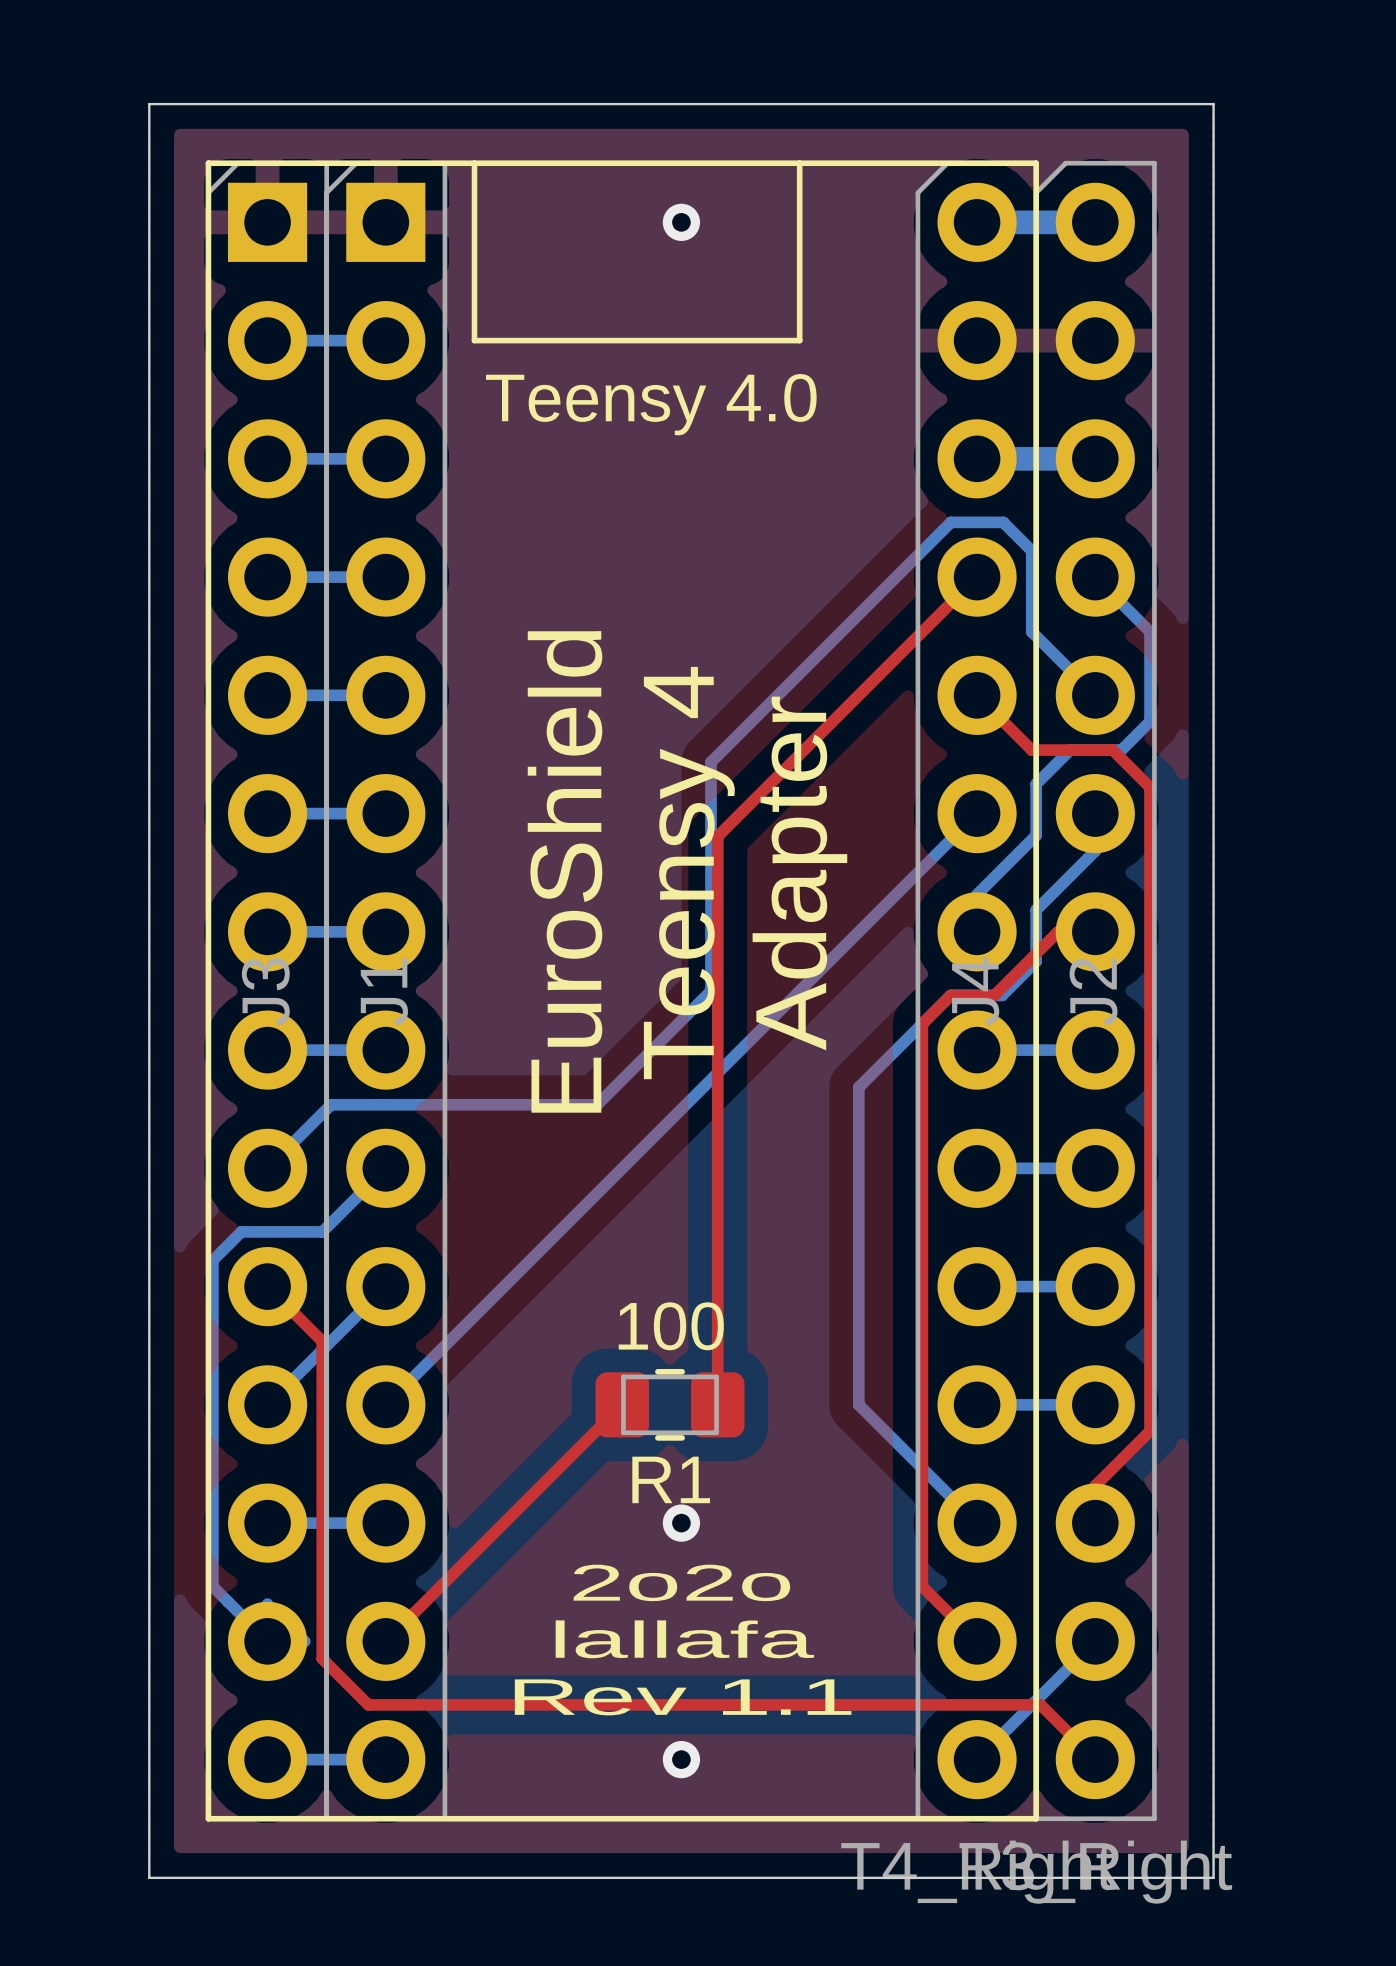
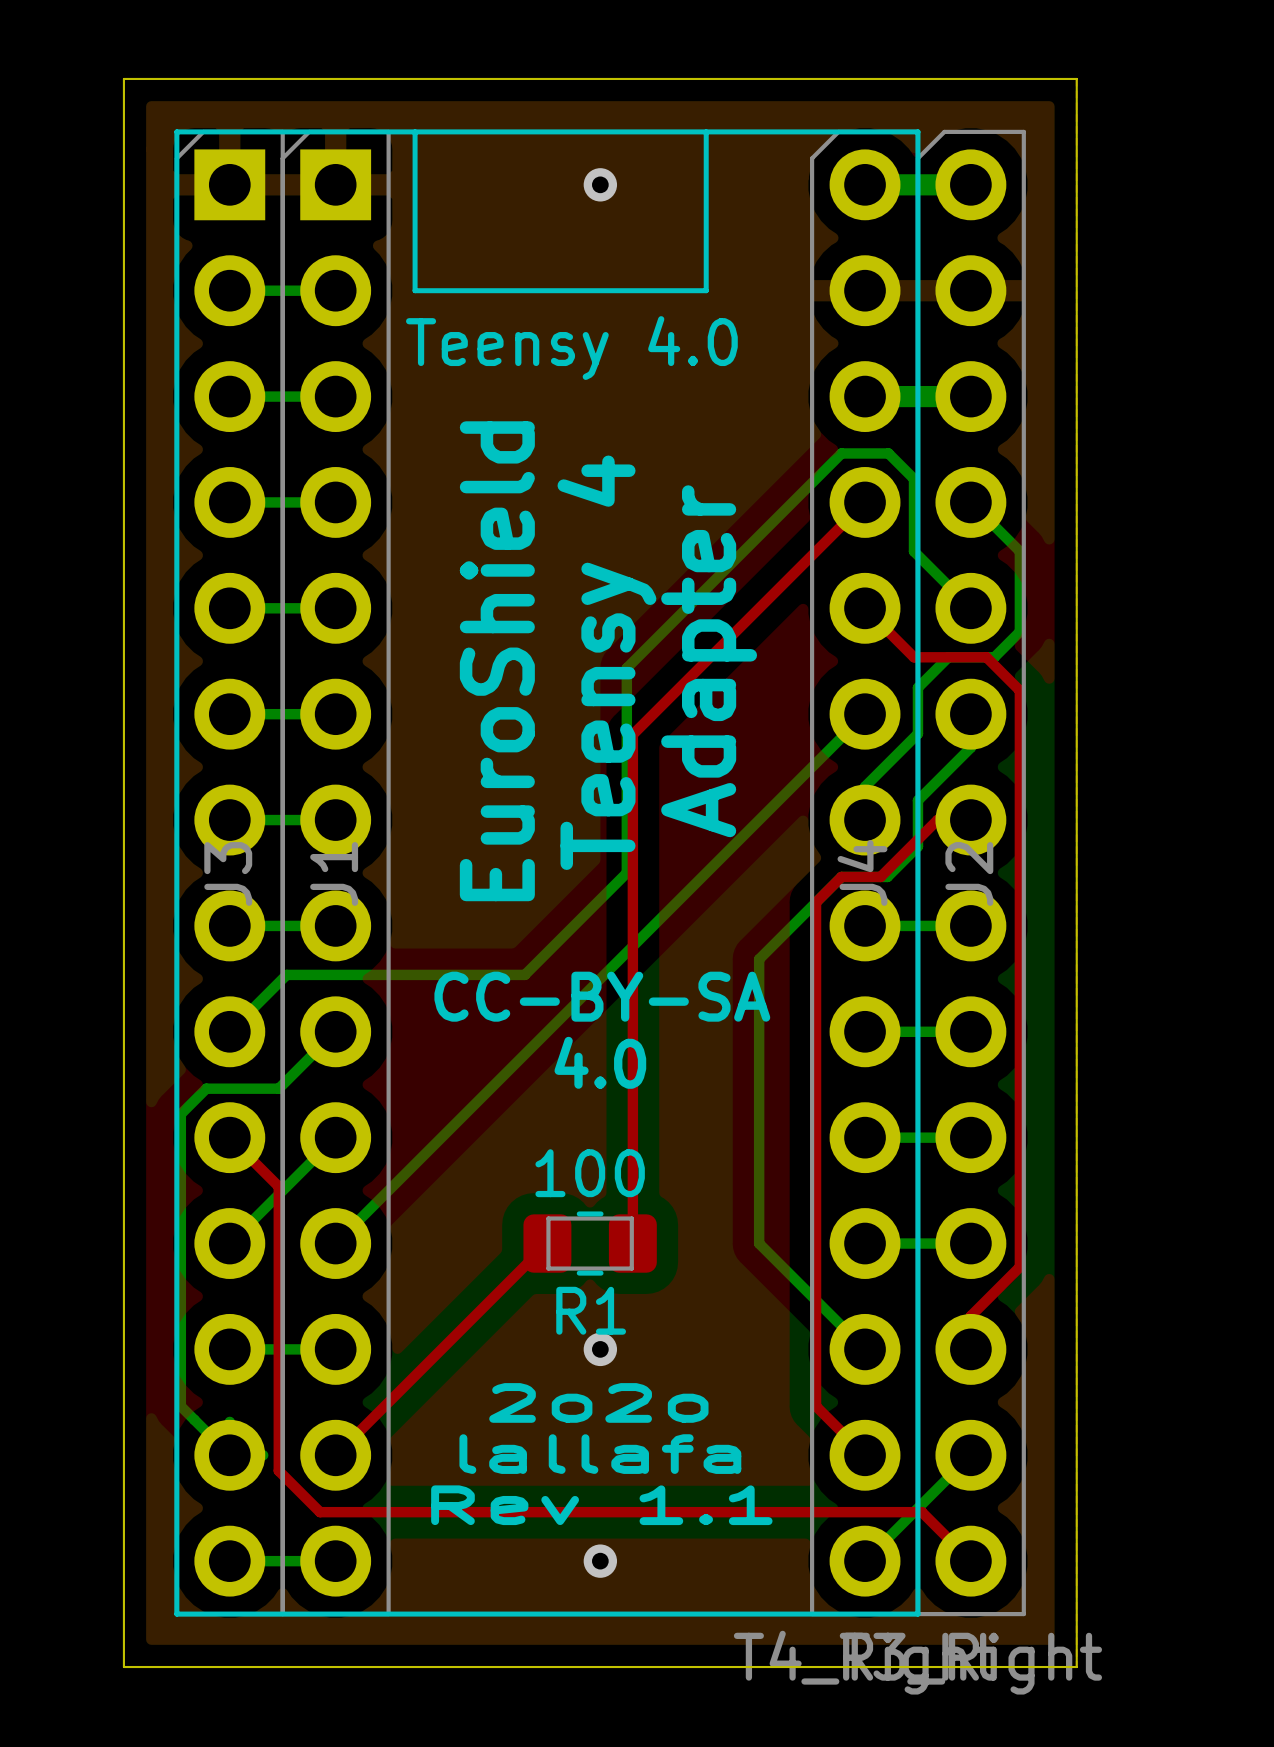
text position: EuroShield (565, 871) -> EuroShield (497, 661)
text position: Teensy 4 (689, 873) -> Teensy 4 (606, 662)
text position: Adapter (799, 873) -> Adapter (709, 661)
text: none -> CC-BY-SA (602, 996)
text: none -> 4.0 (600, 1062)

